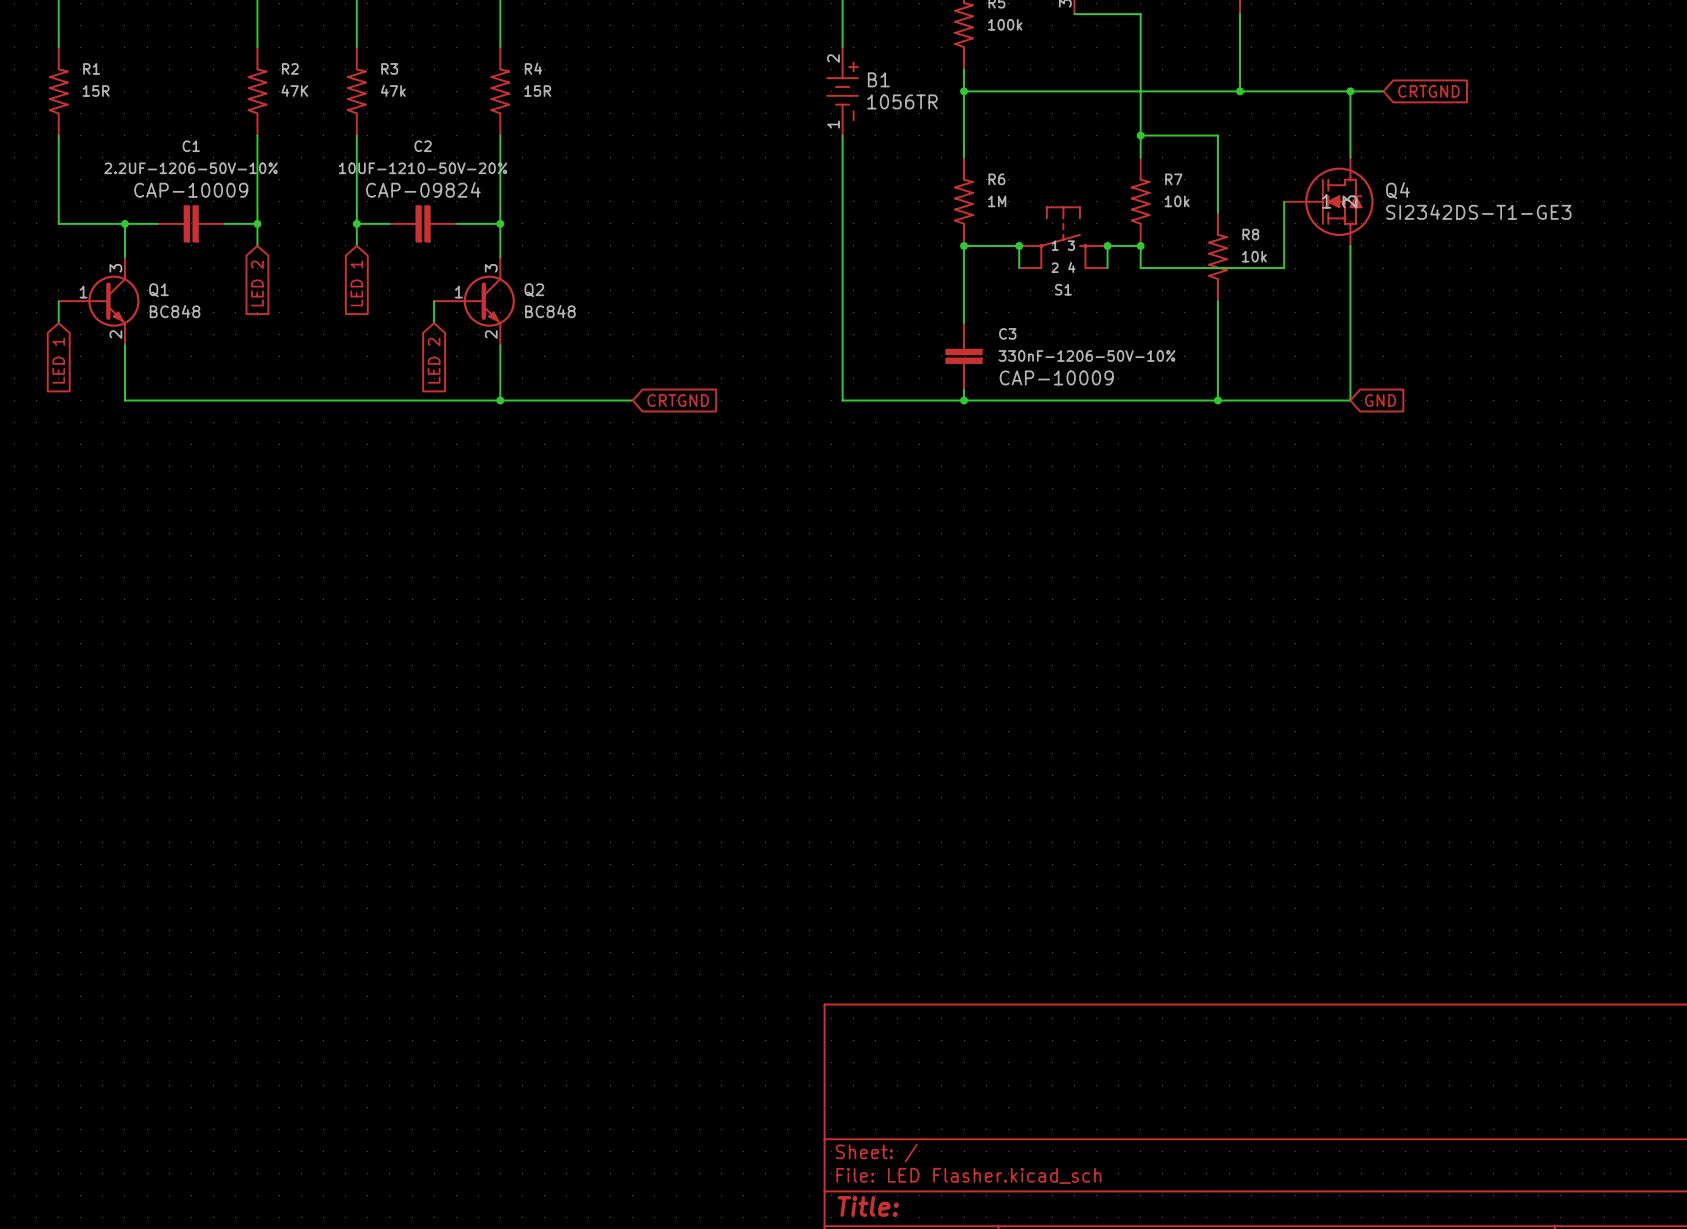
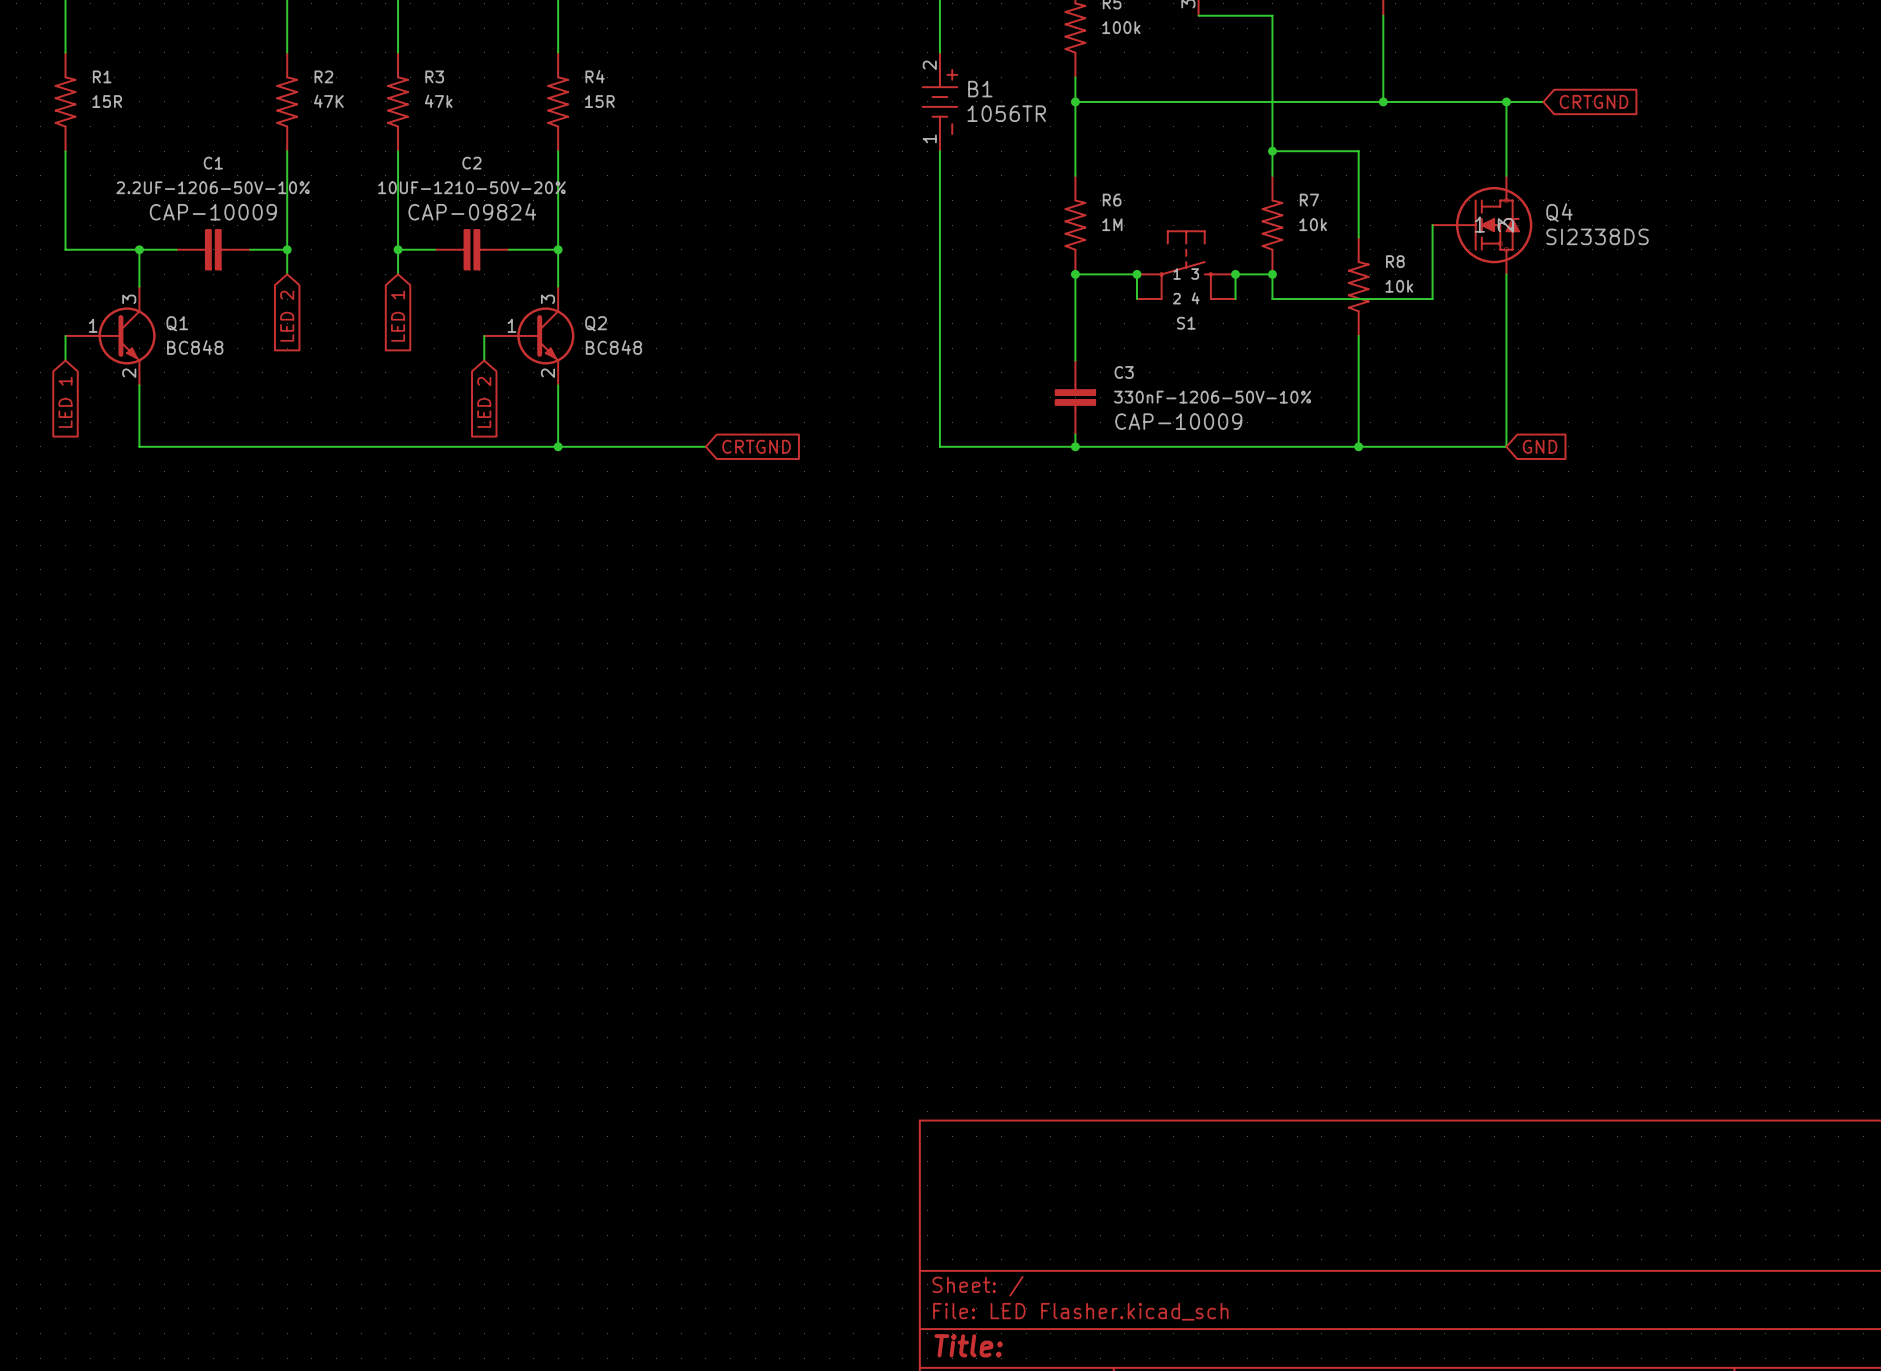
Q4 value: SI2342DS-T1-GE3 (1478, 212) -> SI2338DS (1597, 236)

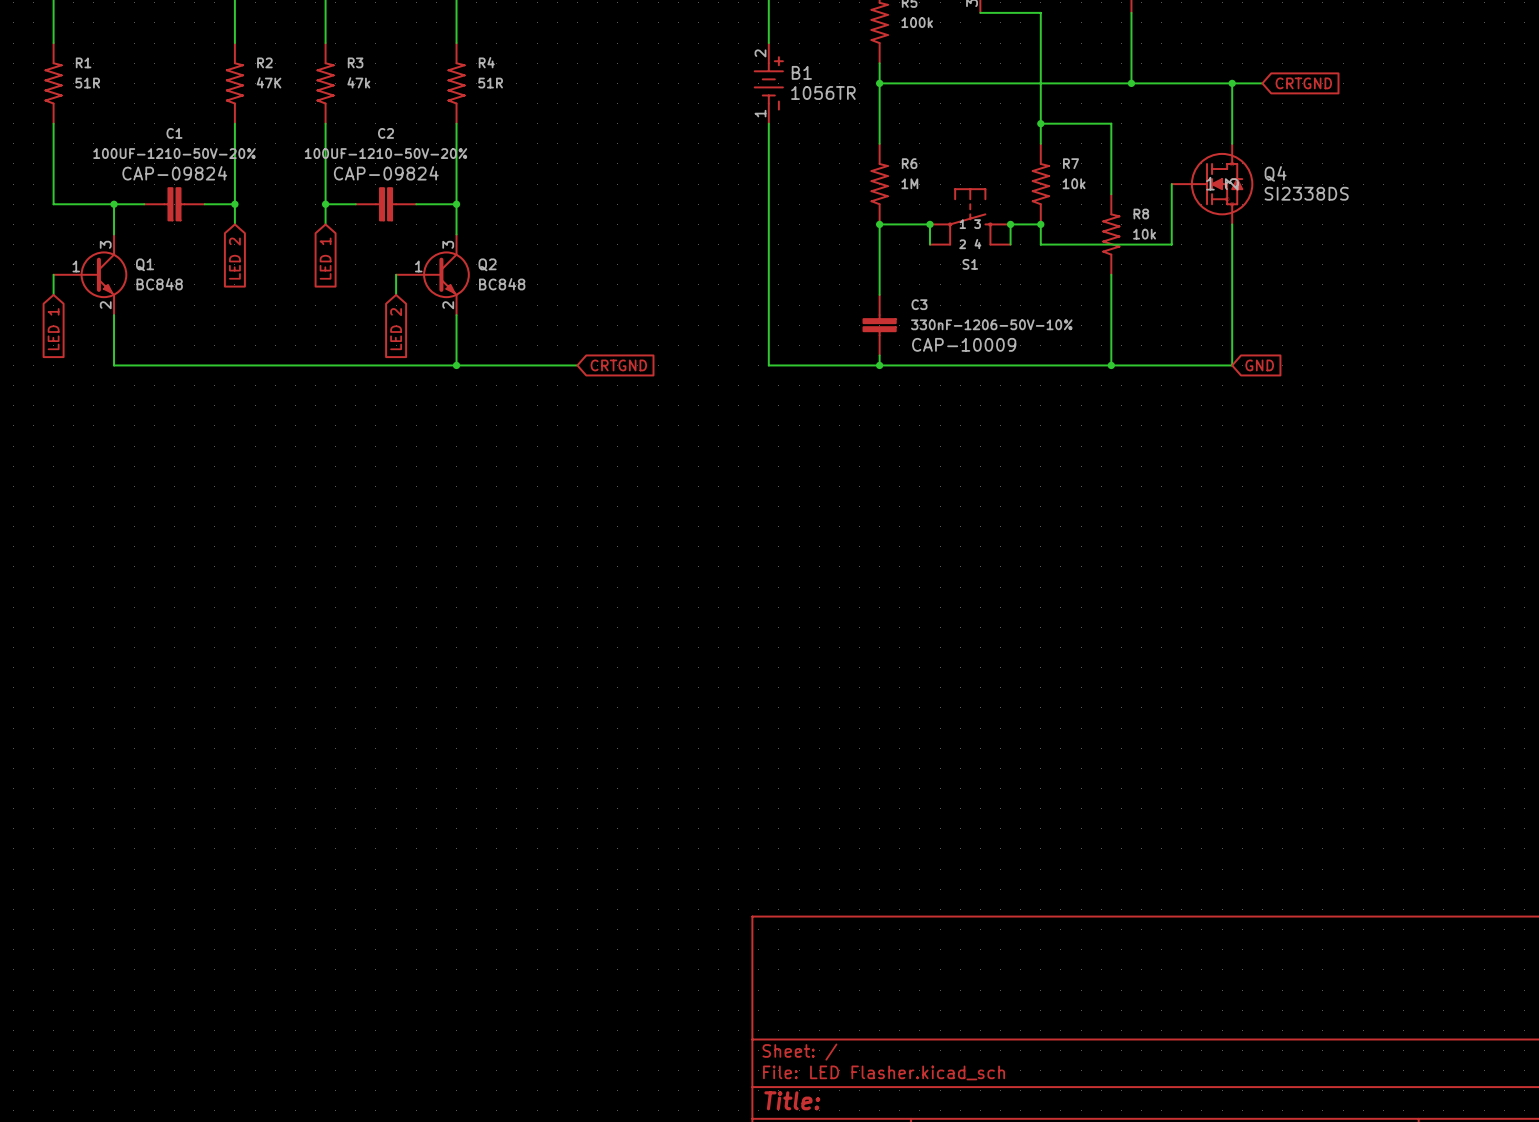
R1 value: 15R (107, 101) -> 51R (87, 83)
R4 value: 15R (599, 101) -> 51R (490, 83)
C1 value: 2.2UF-1206-50V-10% (213, 187) -> 100UF-1210-50V-20% (174, 153)
C2 value: 10UF-1210-50V-20% (471, 187) -> 100UF-1210-50V-20% (386, 153)
C1 text: CAP-10009 (213, 212) -> CAP-09824 (174, 173)

